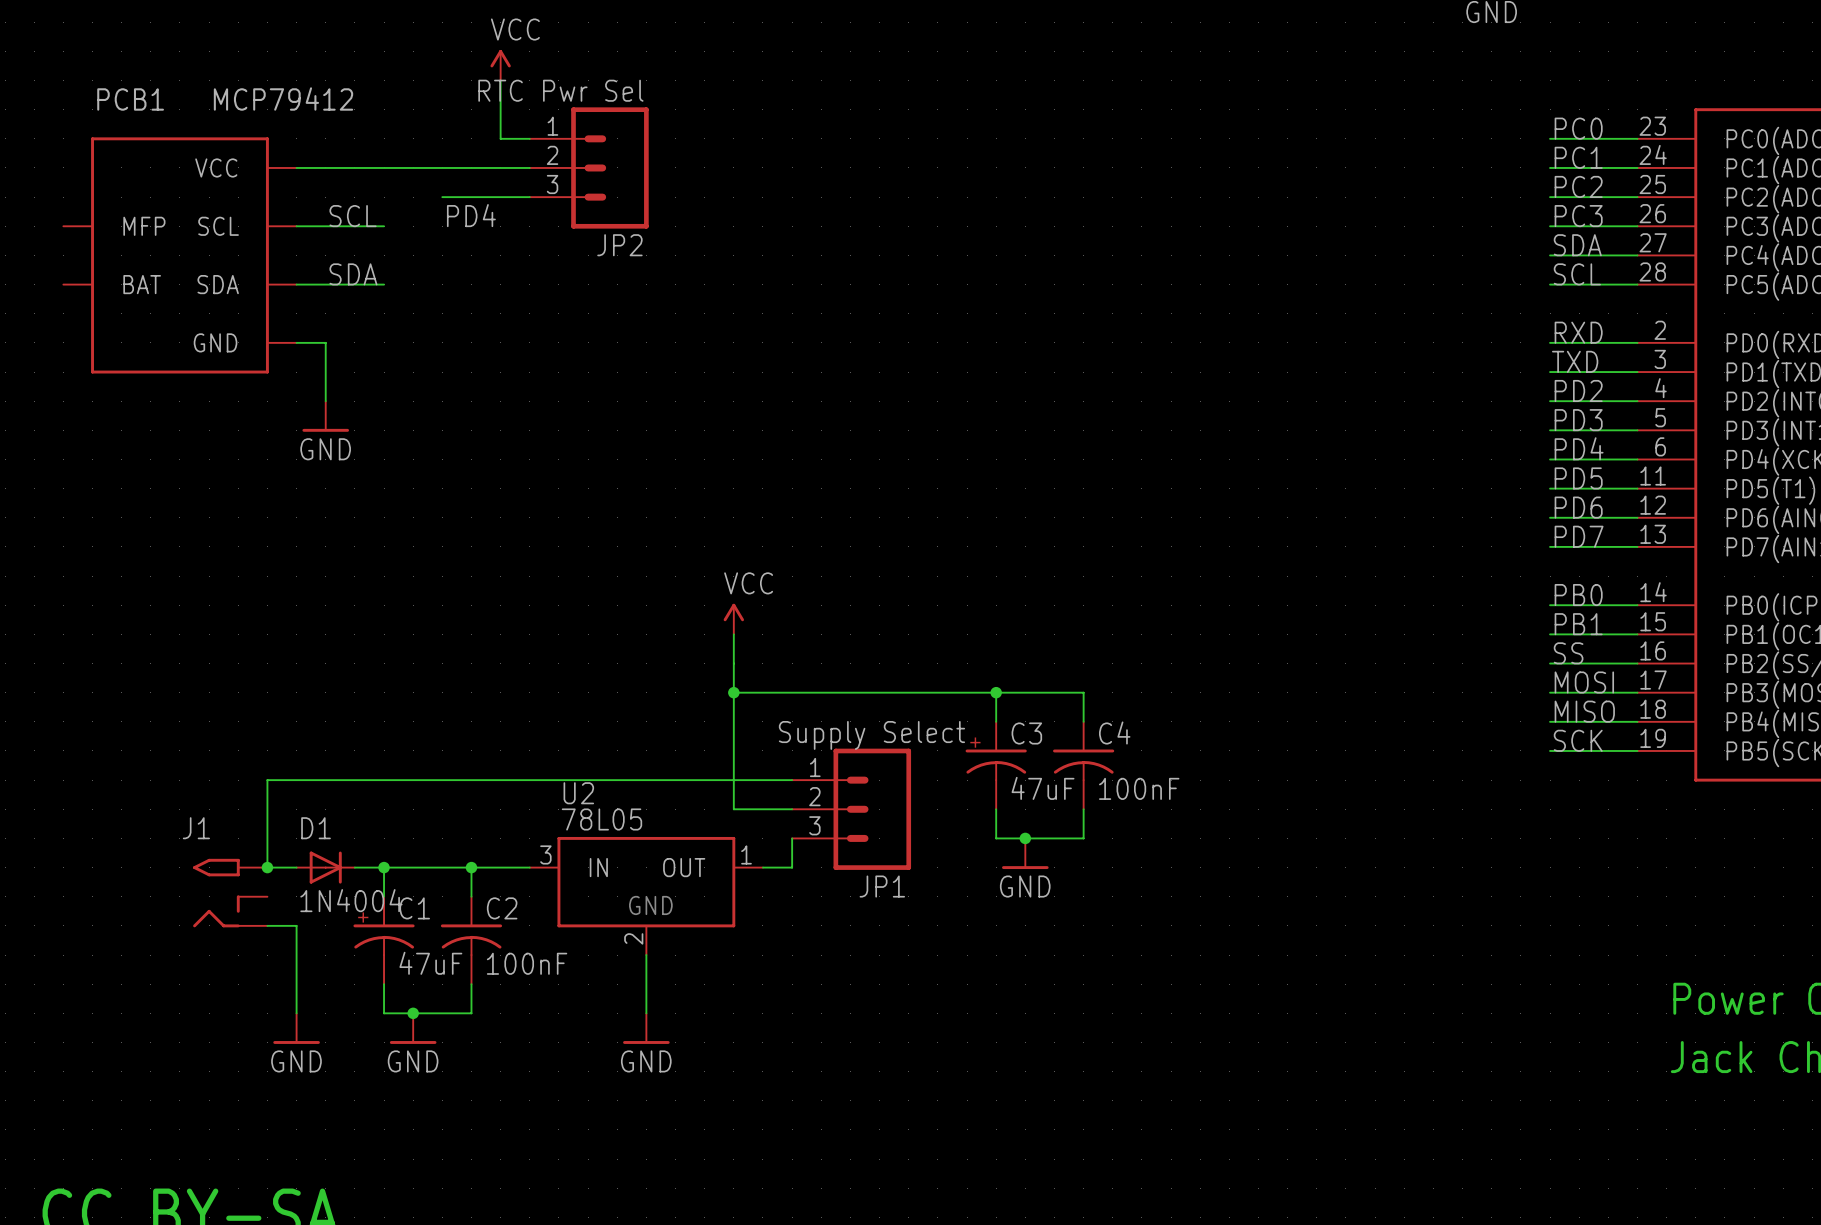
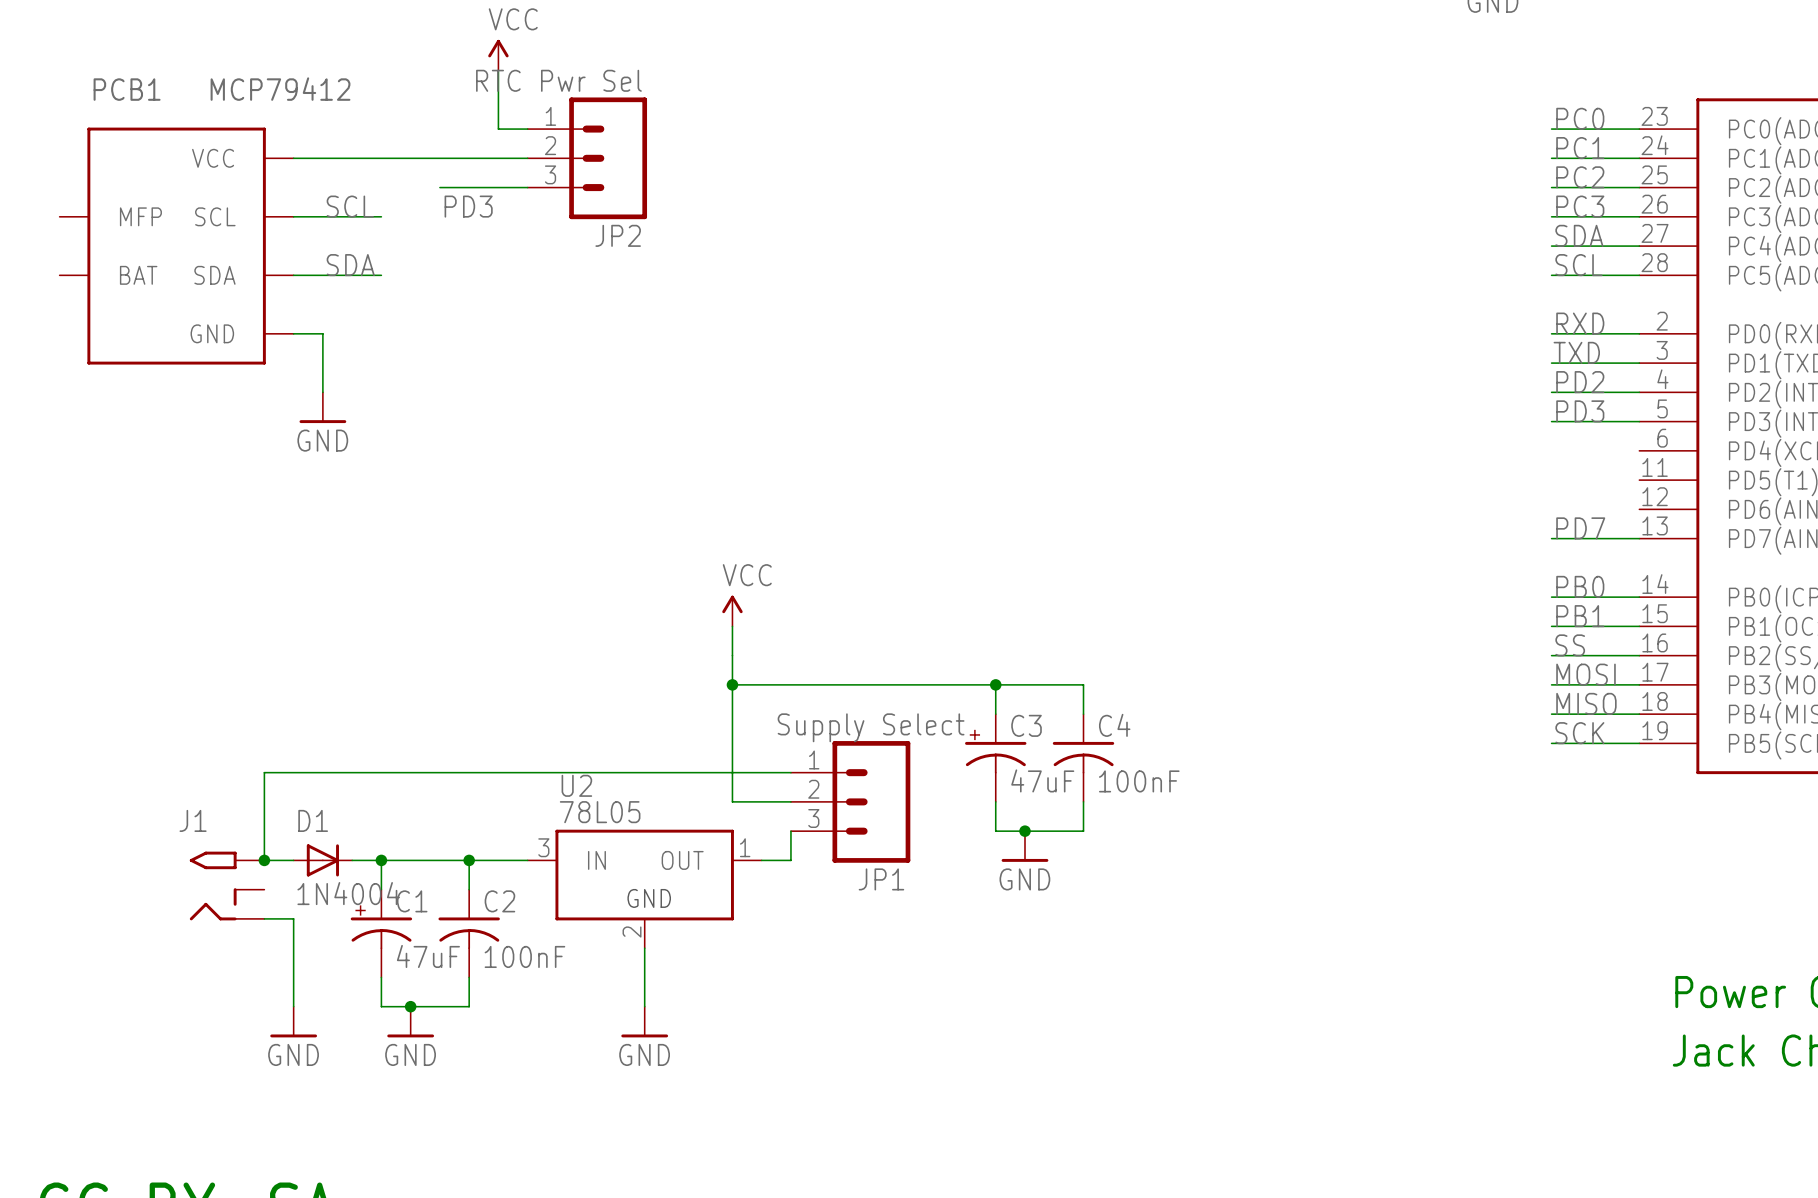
label: PD4 (471, 215) -> PD3 (468, 206)
label: PD4 (1579, 448) -> none
wire: (1550, 459) (1637, 459) -> none
label: PD5 (1578, 478) -> none
wire: (1550, 488) (1637, 488) -> none
label: PD6 (1578, 507) -> none
wire: (1550, 517) (1637, 517) -> none

